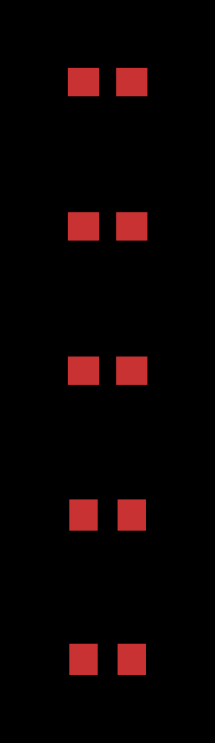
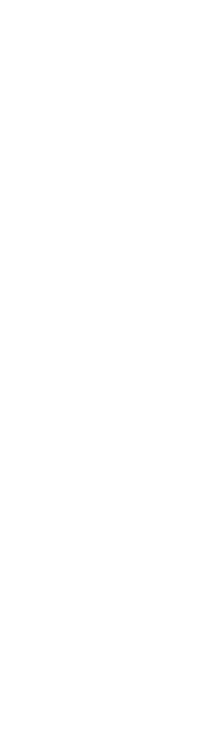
part: (107, 82) -> none
part: (107, 226) -> none
part: (107, 370) -> none
part: (107, 515) -> none
part: (107, 659) -> none

